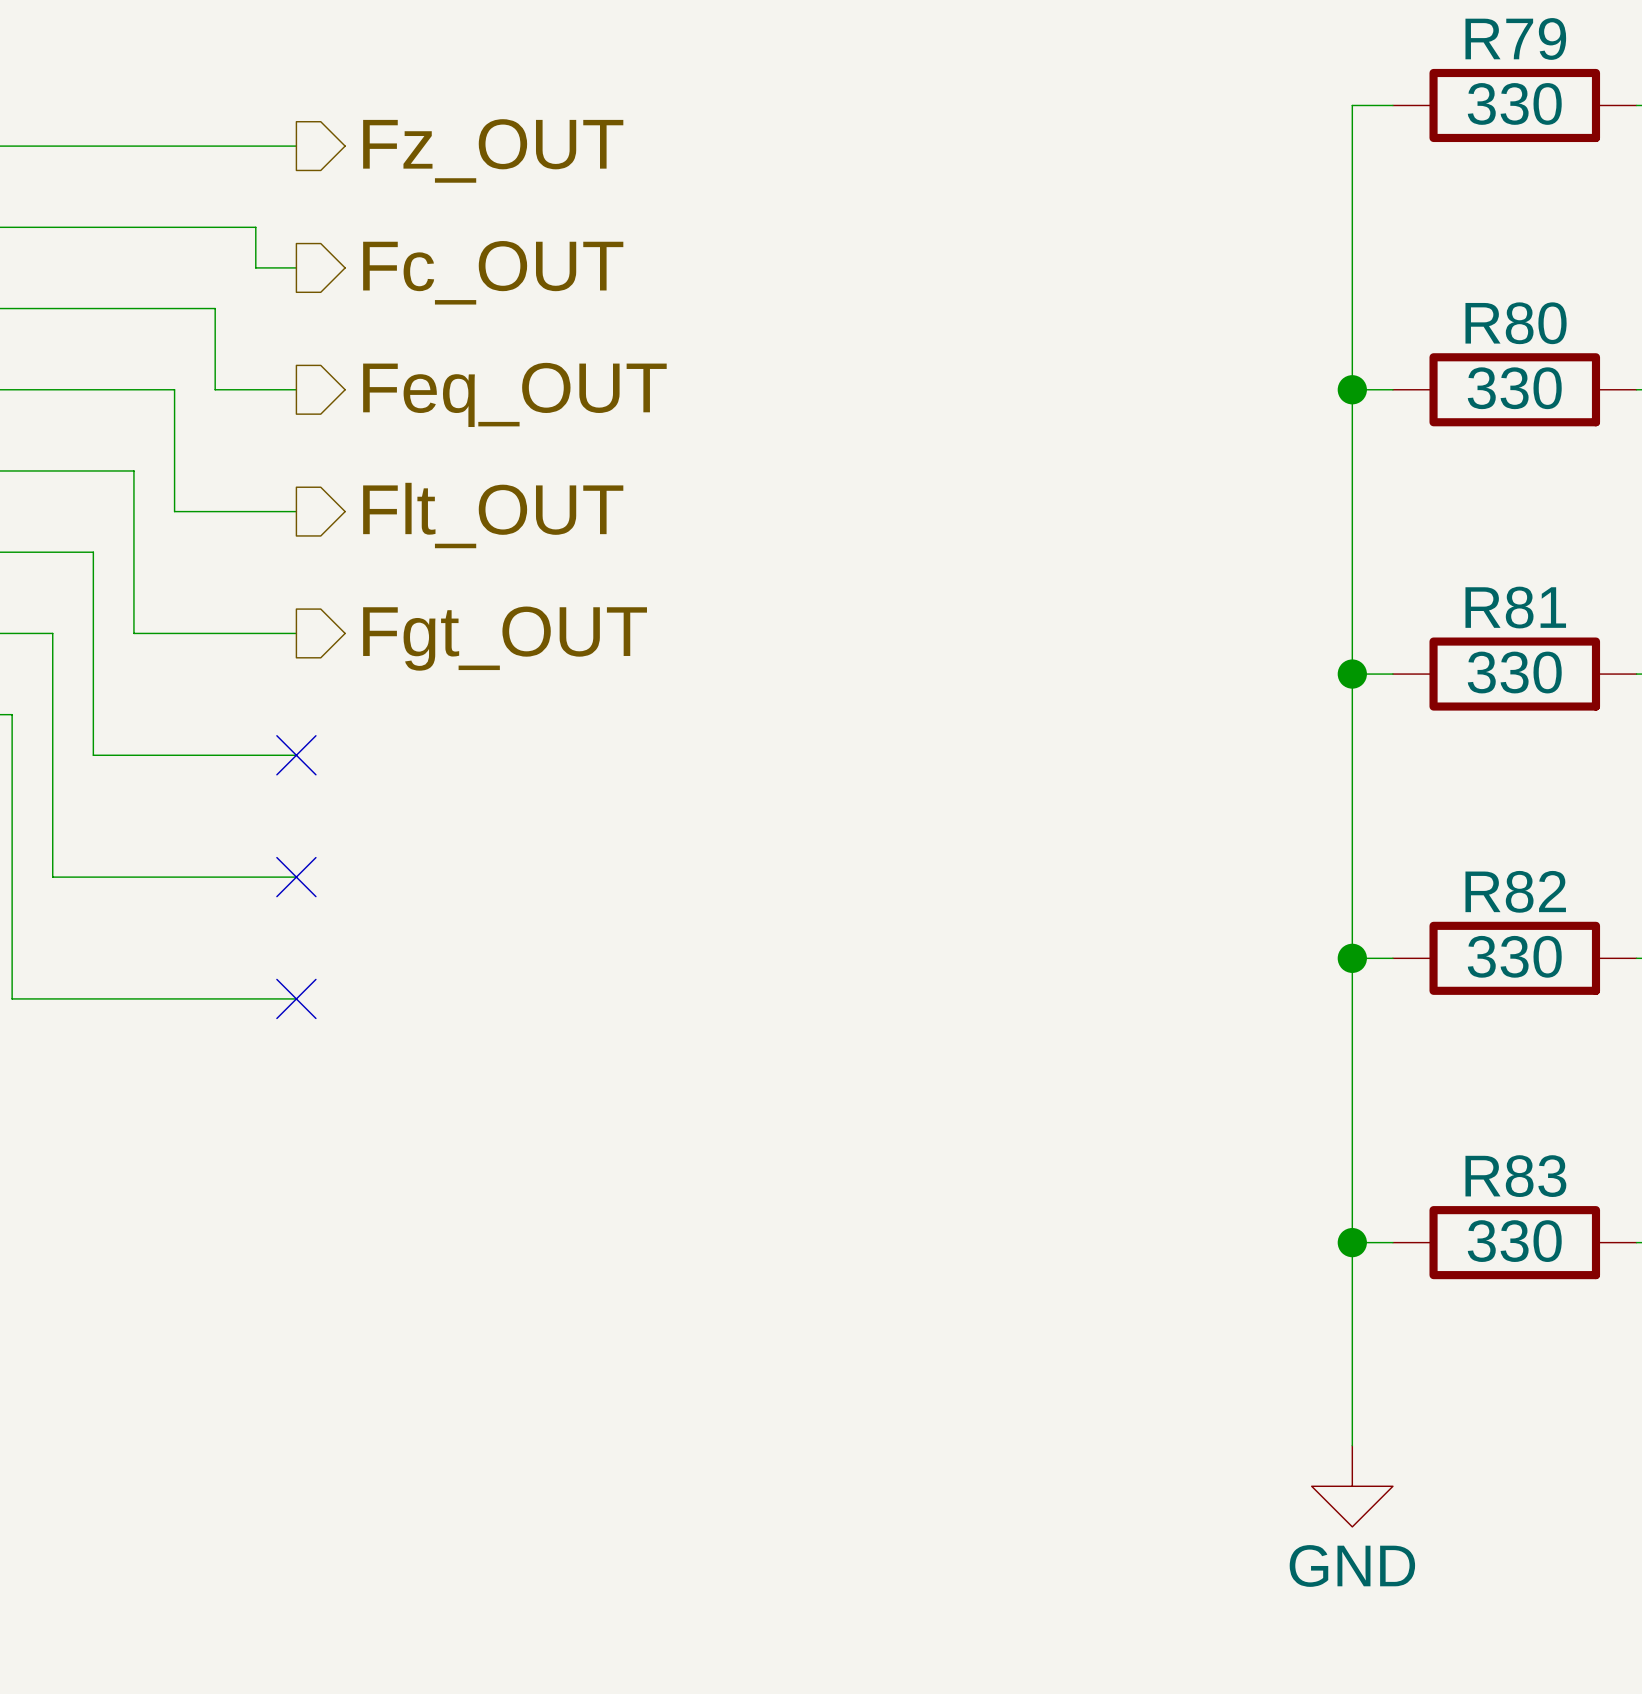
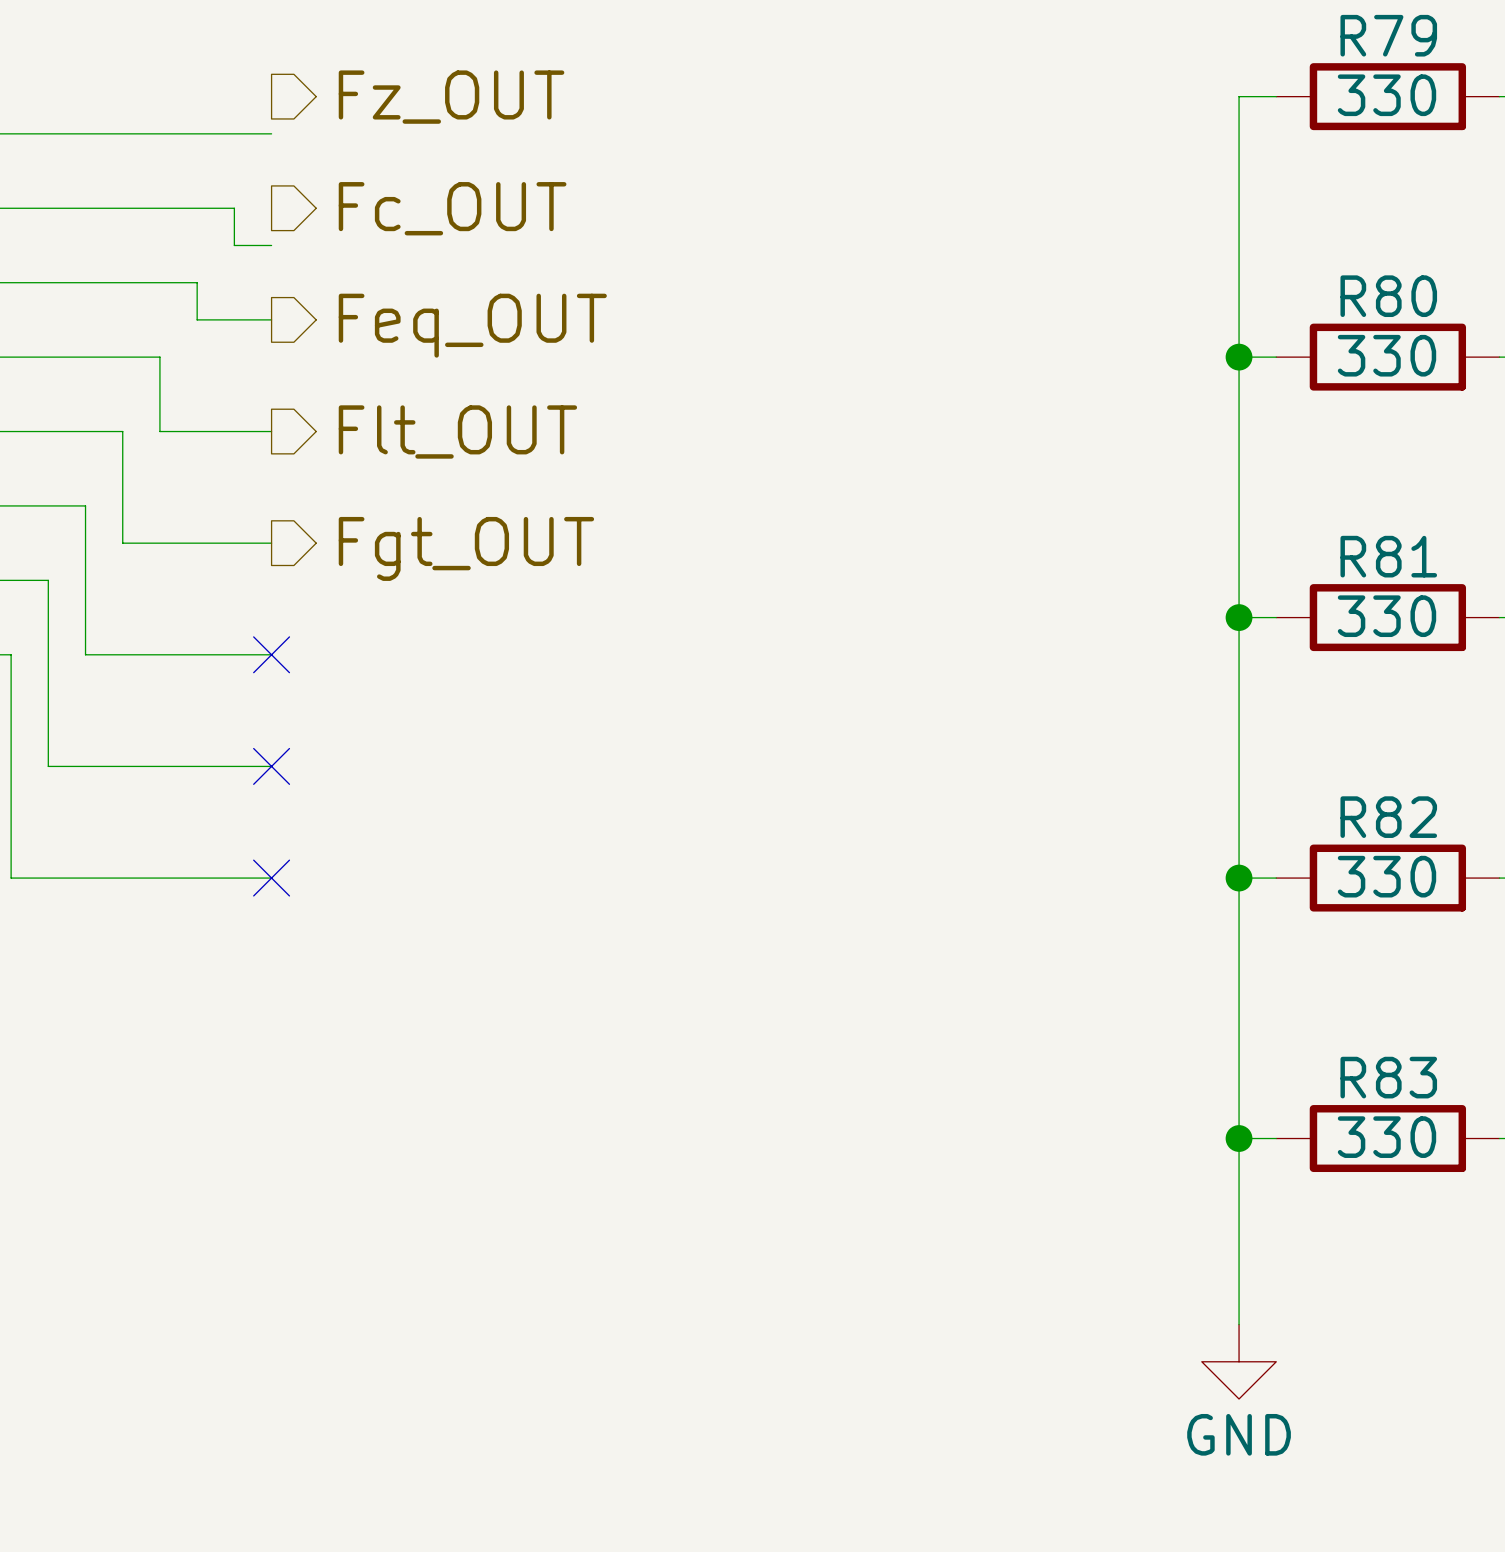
hierarchical label position: Fz_OUT (493, 150) -> Fz_OUT (451, 97)
hierarchical label position: Fc_OUT (493, 272) -> Fc_OUT (452, 208)
wire: (215, 349) (215, 389) (296, 389) -> (197, 319) (271, 319)
hierarchical label position: Feq_OUT (514, 394) -> Feq_OUT (472, 325)
wire: (174, 470) (174, 511) (296, 511) -> (159, 431) (271, 431)
hierarchical label position: Flt_OUT (493, 515) -> Flt_OUT (457, 431)
wire: (133, 592) (133, 633) (296, 633) -> (122, 543) (271, 543)
hierarchical label position: Fgt_OUT (505, 638) -> Fgt_OUT (466, 548)
wire: (93, 714) (93, 755) (296, 755) -> (85, 654) (271, 654)
no-connect mark: none -> (271, 654)
no-connect mark: (296, 755) -> none
wire: (52, 836) (52, 877) (296, 877) -> (48, 766) (271, 766)
no-connect mark: none -> (271, 766)
no-connect mark: (296, 877) -> none
wire: (12, 958) (12, 998) (296, 998) -> (11, 878) (271, 878)
no-connect mark: none -> (271, 878)
no-connect mark: (296, 998) -> none

